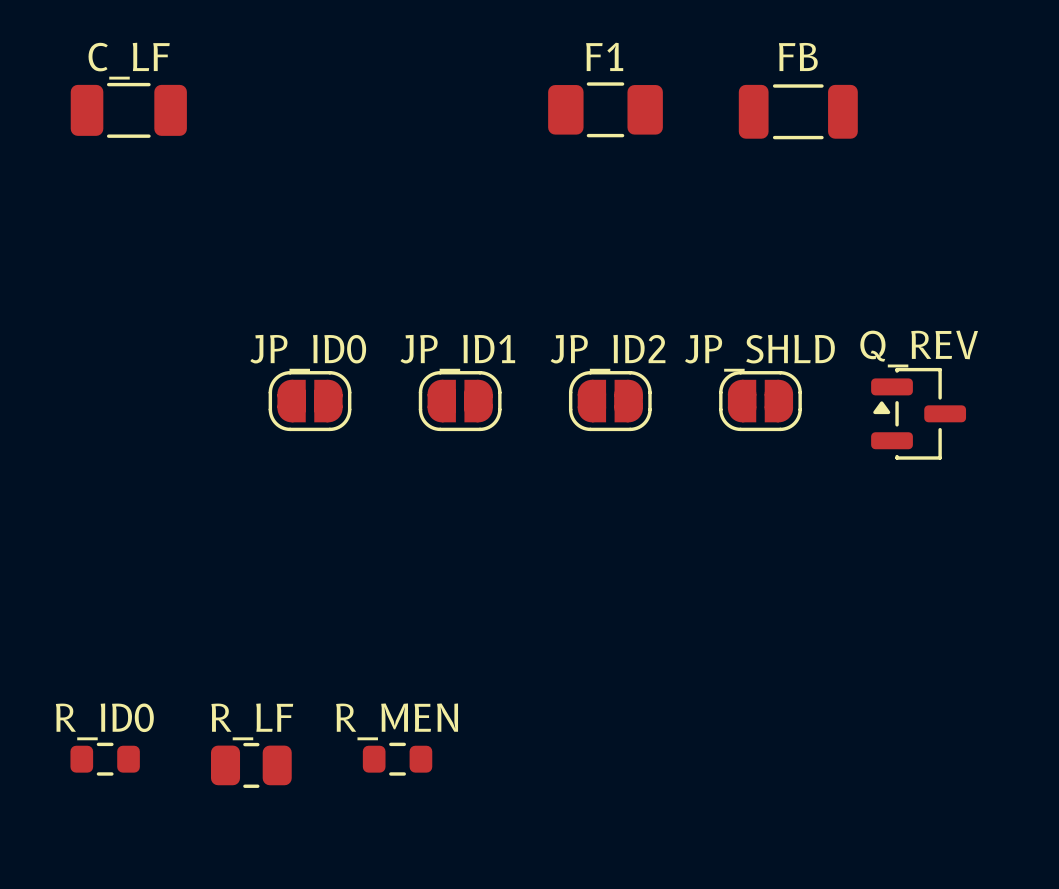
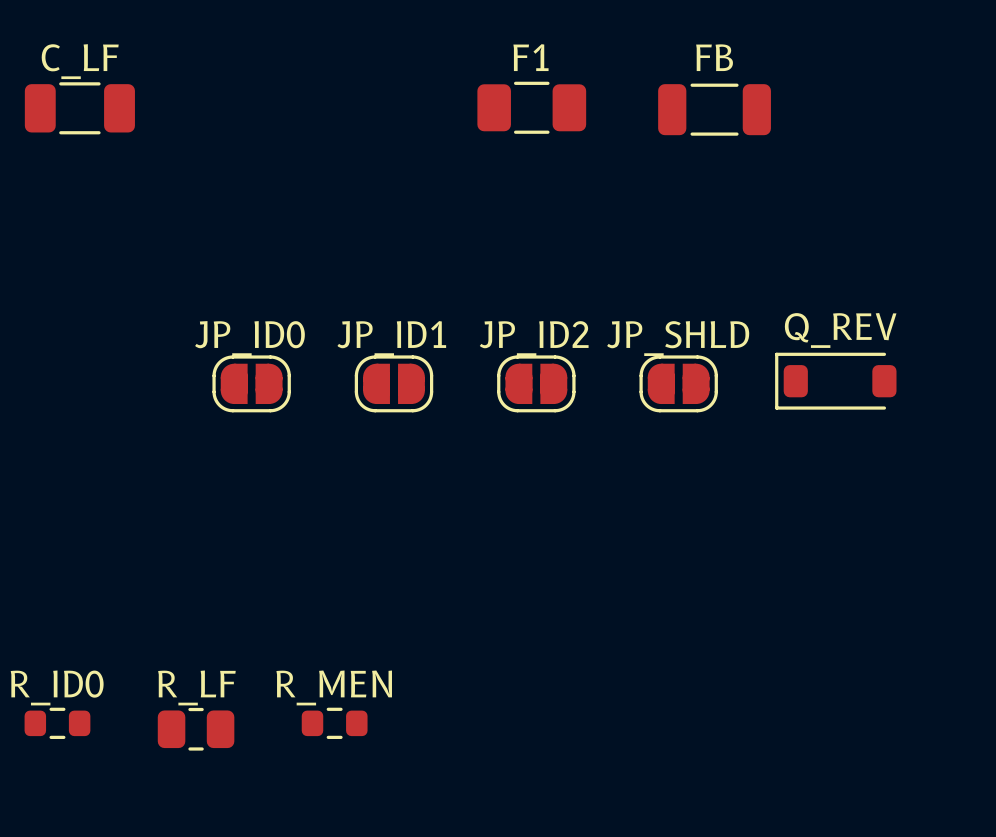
Q_REV footprint: [871, 367, 967, 460] -> [775, 352, 897, 410]

